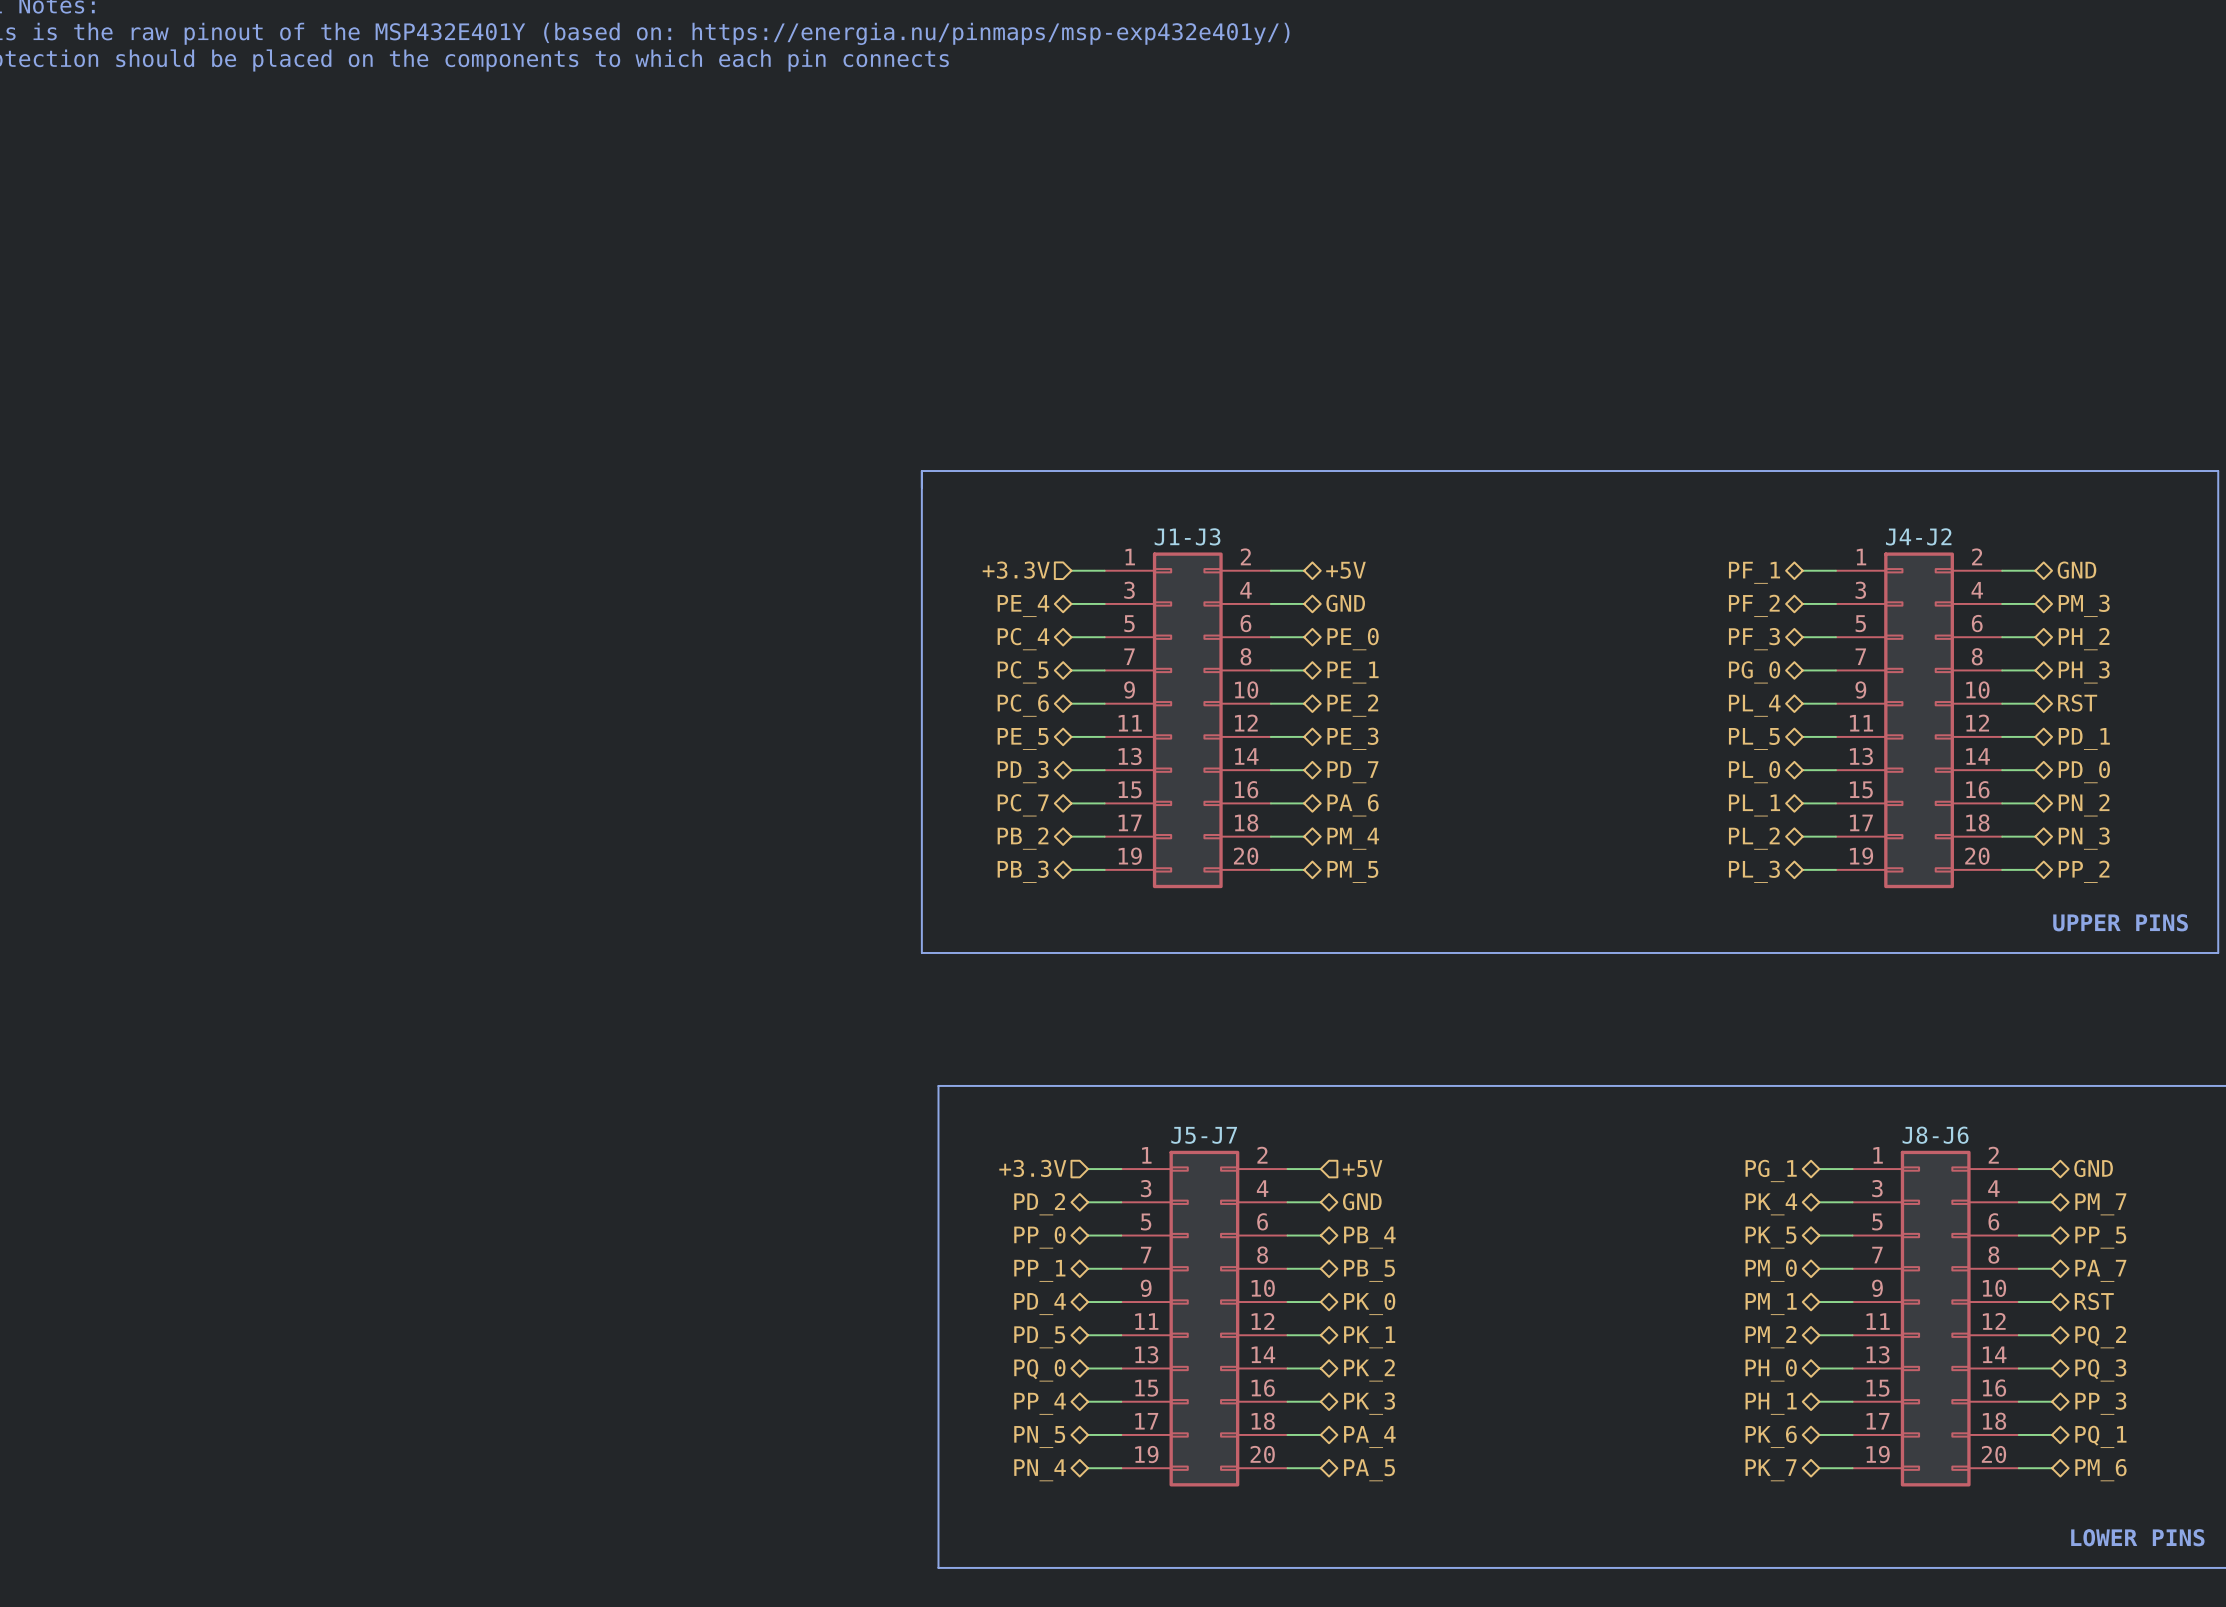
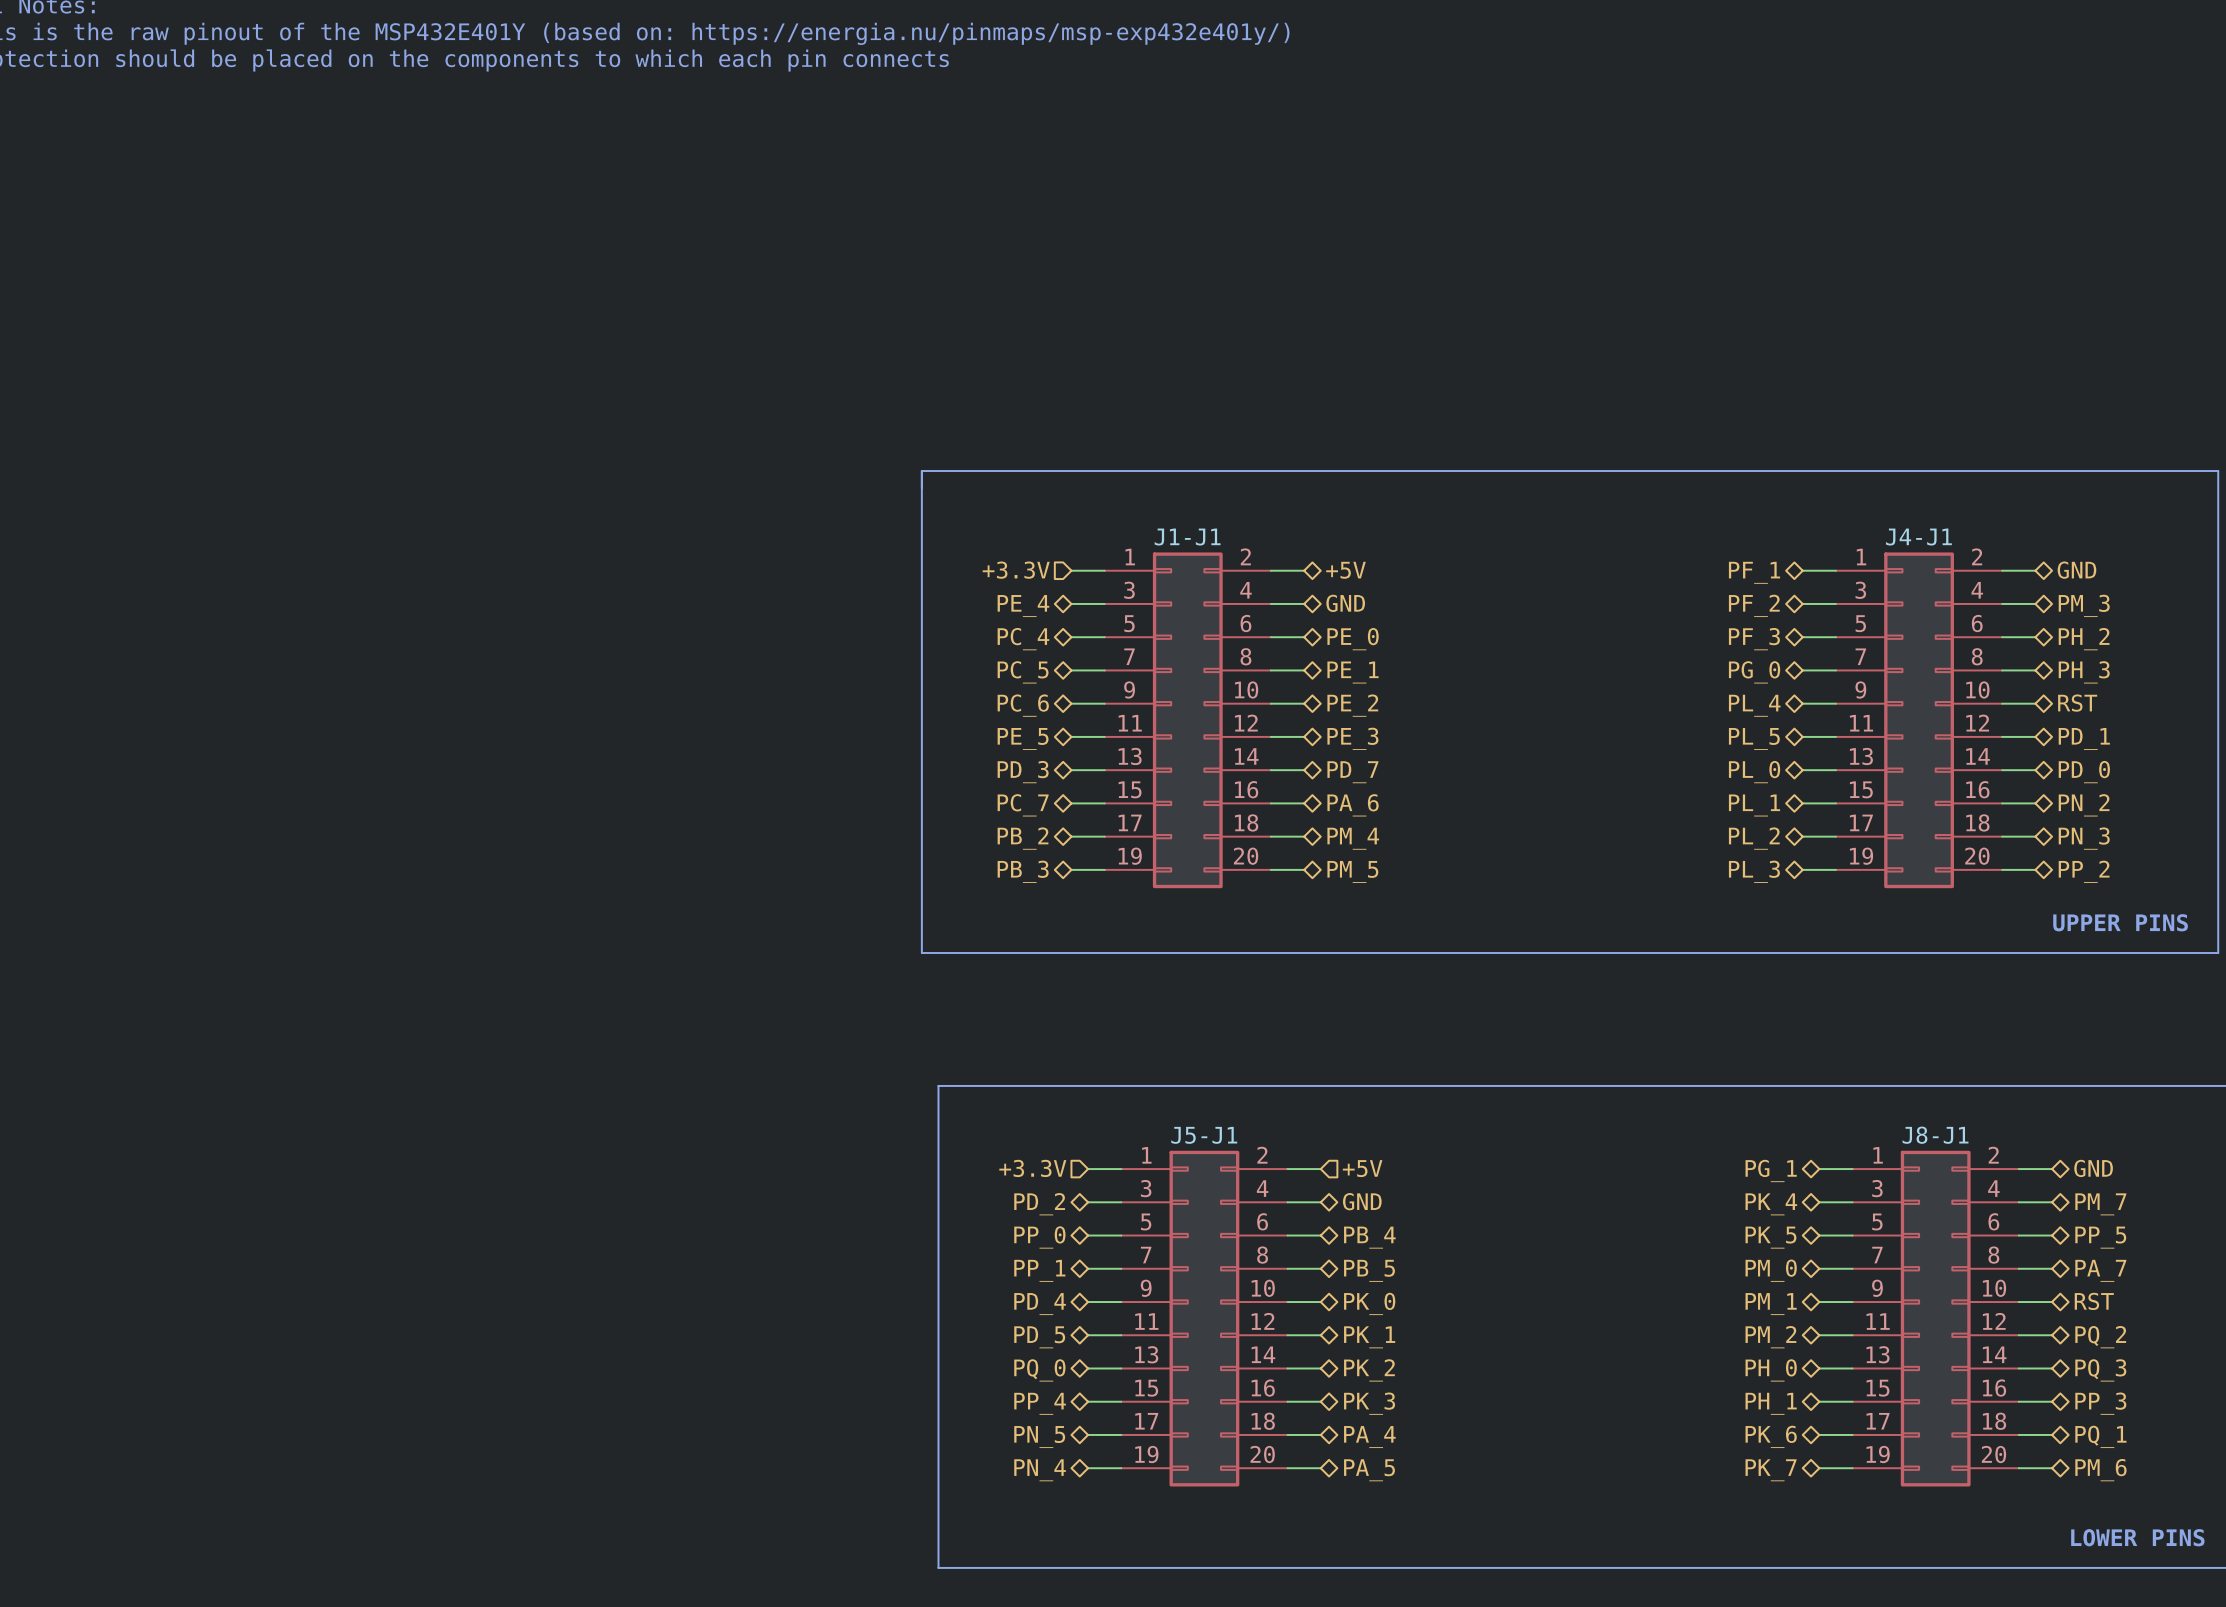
J1-J3 name: J1-J3 (1187, 536) -> J1-J1 (1187, 537)
J4-J2 name: J4-J2 (1918, 536) -> J4-J1 (1918, 537)
J5-J7 name: J5-J7 (1204, 1135) -> J5-J1 (1204, 1135)
J8-J6 name: J8-J6 (1935, 1135) -> J8-J1 (1935, 1135)

